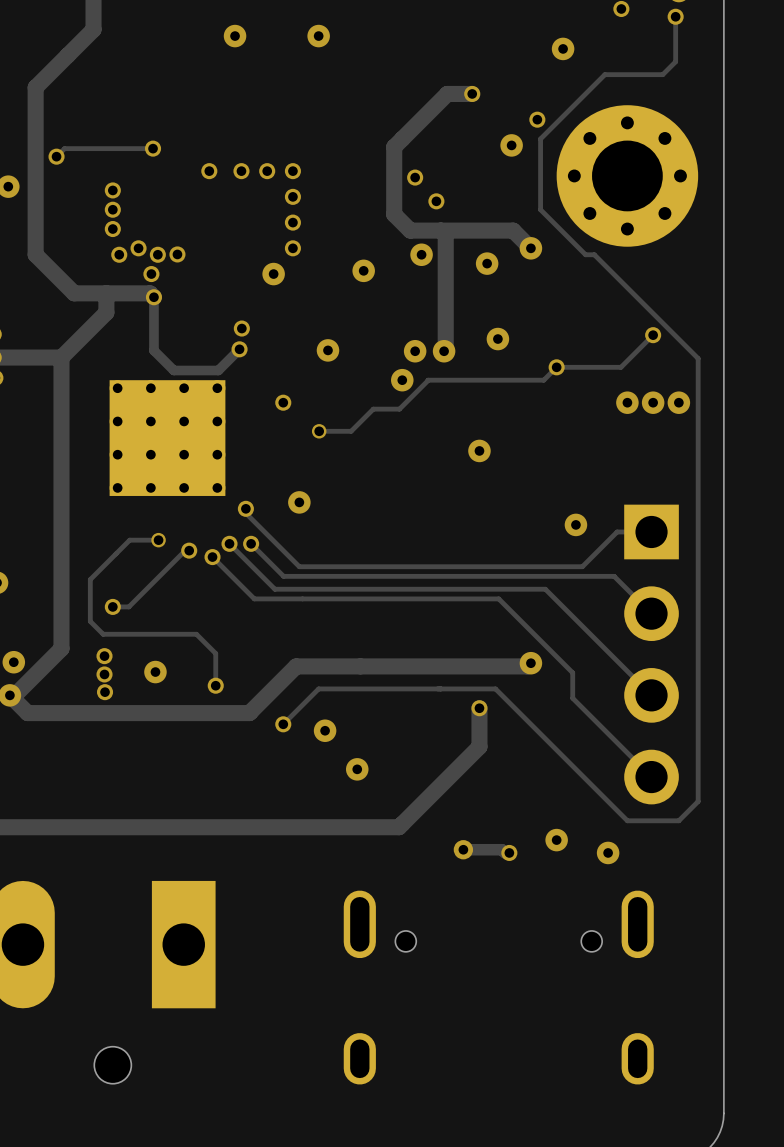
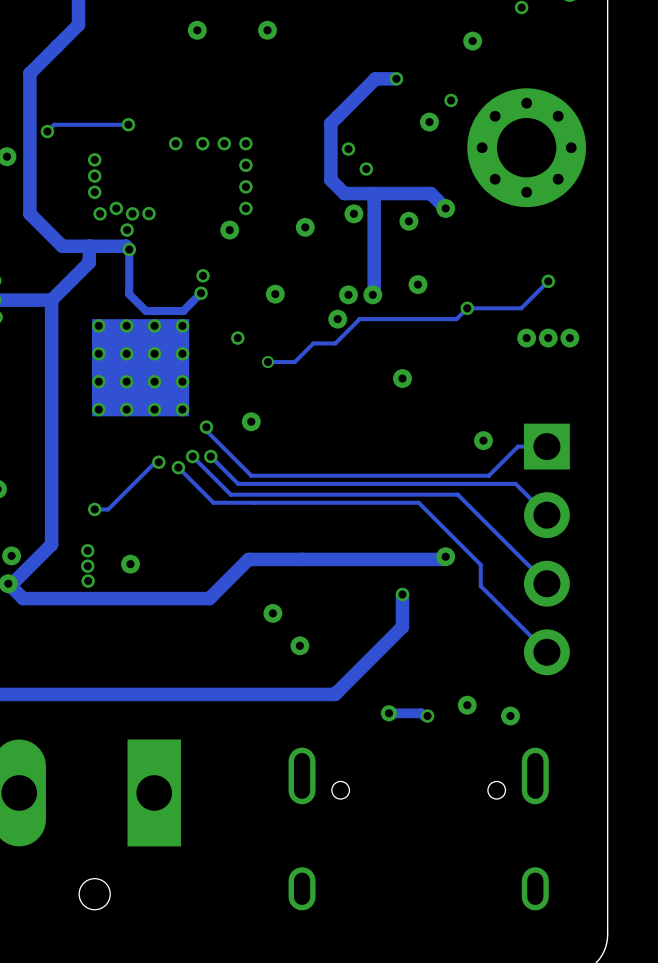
track: (675, 16) (675, 61) (662, 74) (604, 74) (540, 138) (540, 209) (585, 254) (594, 254) (698, 358) (698, 801) (678, 820) (627, 820) (495, 688) (318, 688) (280, 727) -> none
via: (675, 16) -> none
track: (158, 540) (129, 540) (90, 579) (90, 621) (103, 634) (196, 634) (215, 653) (215, 685) -> none
via: (158, 540) -> none
via: (215, 685) -> none
via: (283, 724) -> none

